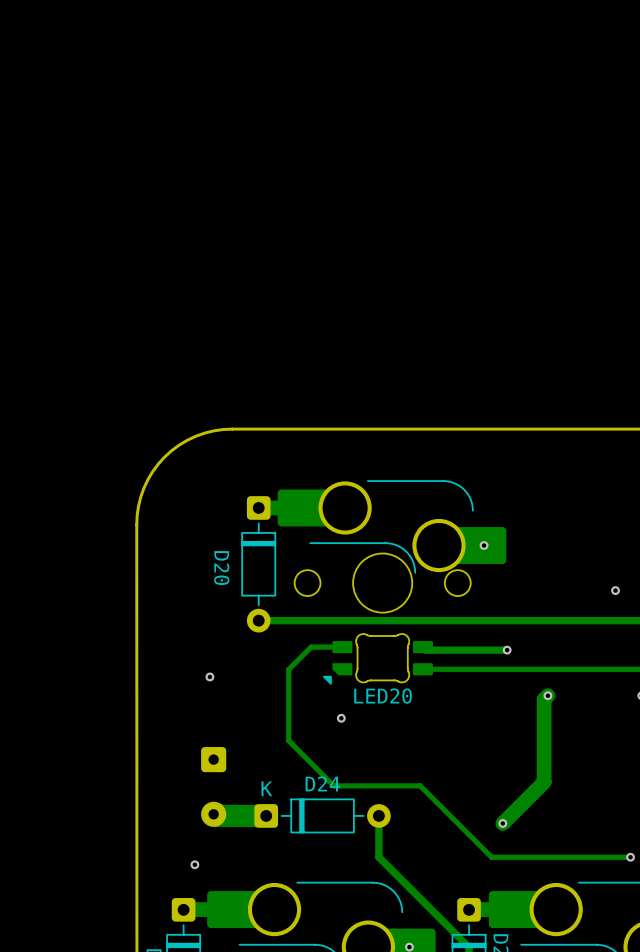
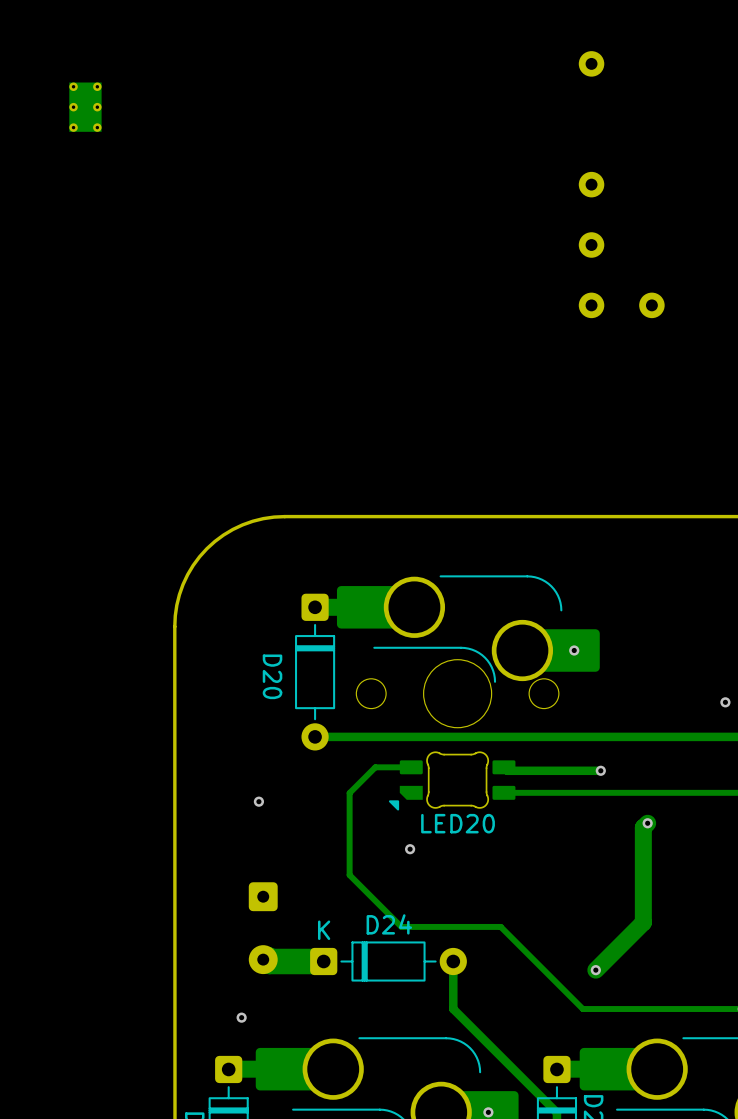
part: none -> (591, 63)
part: none -> (85, 107)
part: none -> (591, 184)
part: none -> (591, 245)
part: none -> (591, 305)
part: none -> (651, 305)

